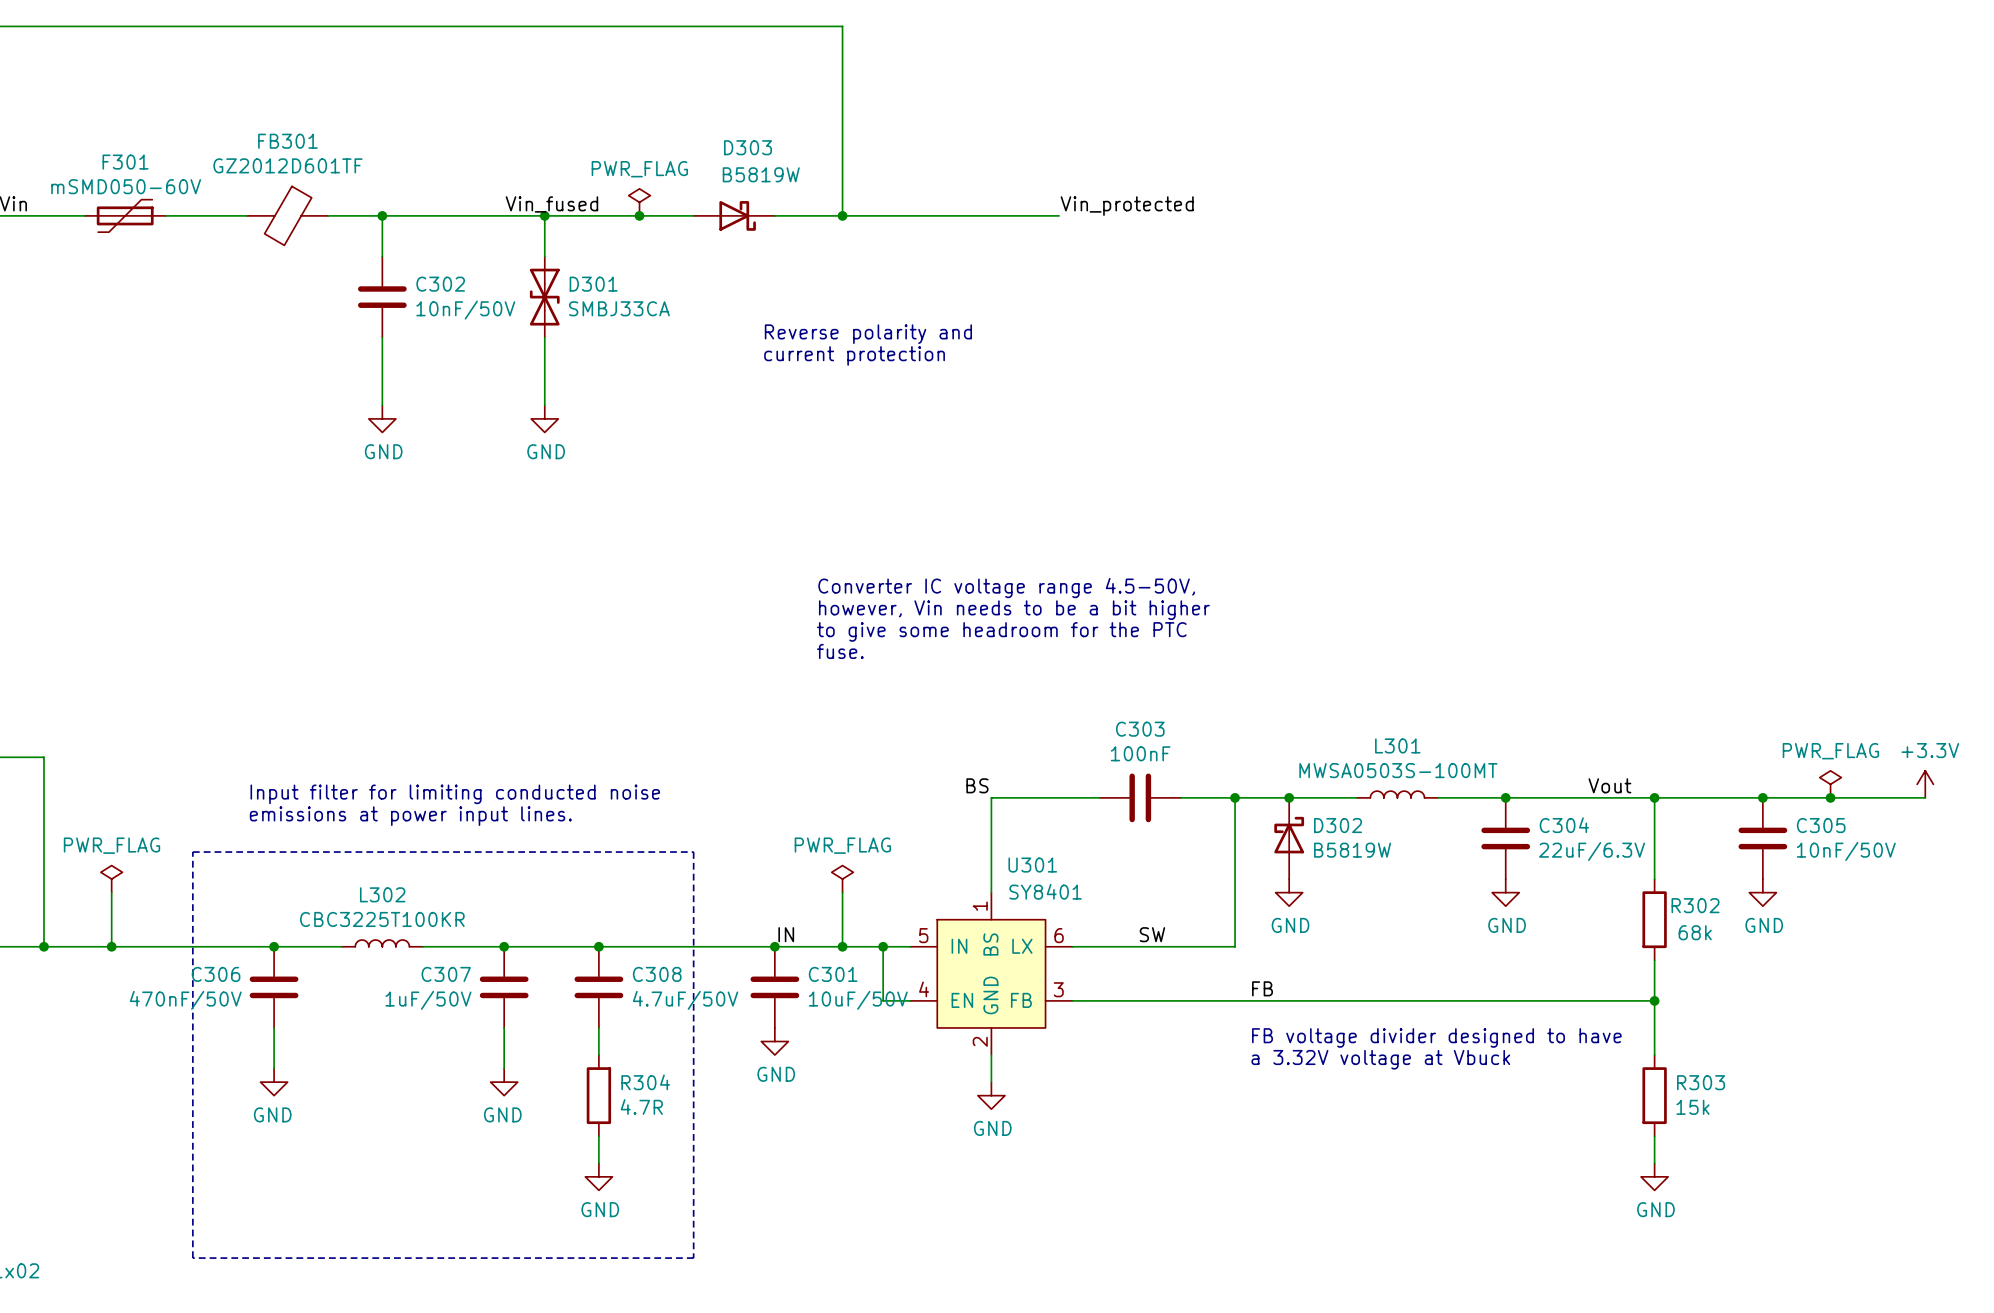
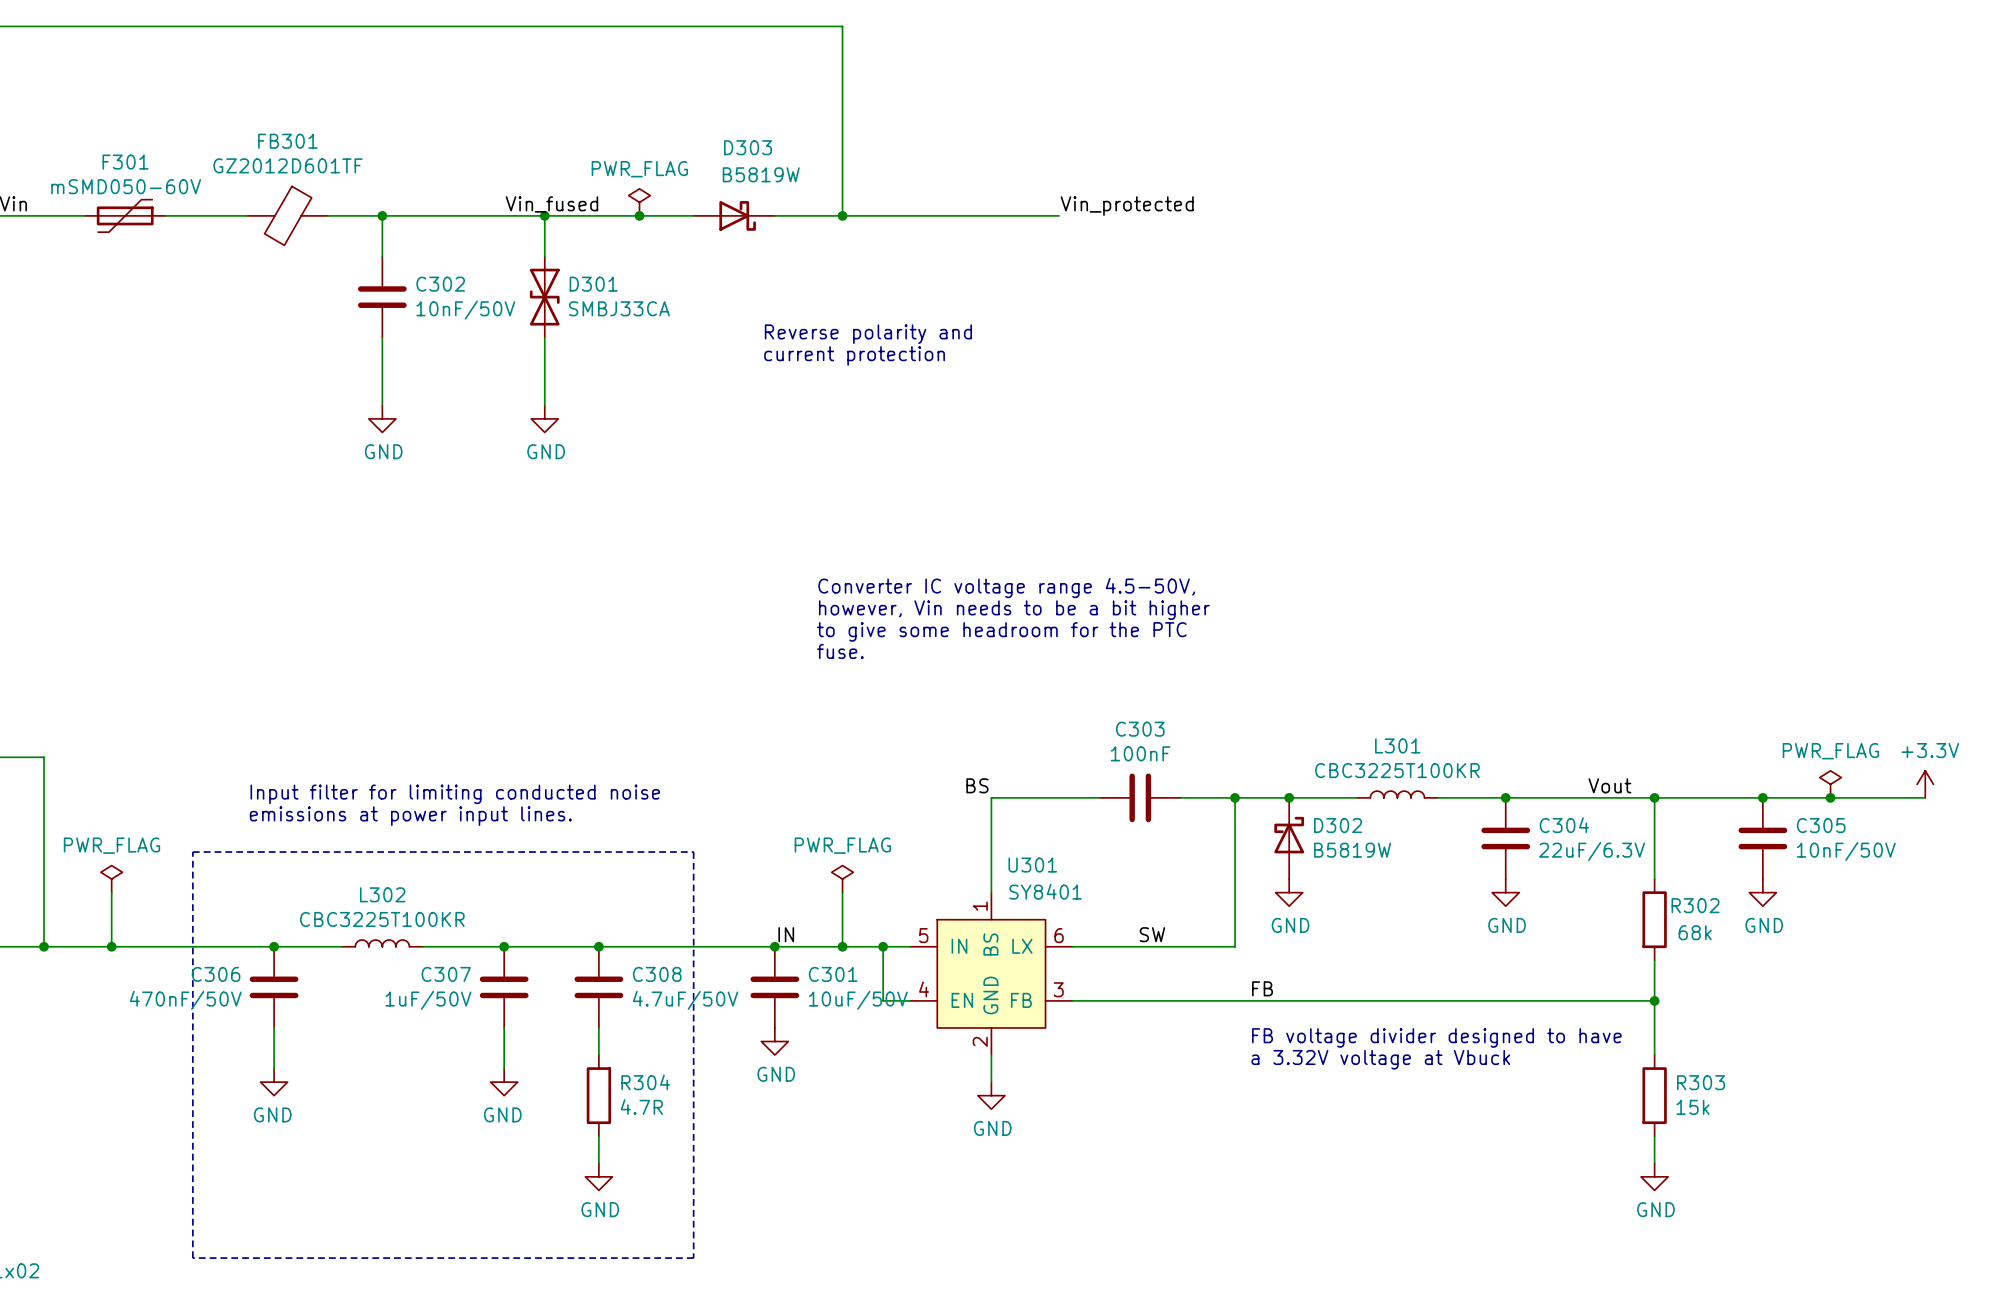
L301 value: MWSA0503S-100MT (1398, 770) -> CBC3225T100KR (1397, 770)

